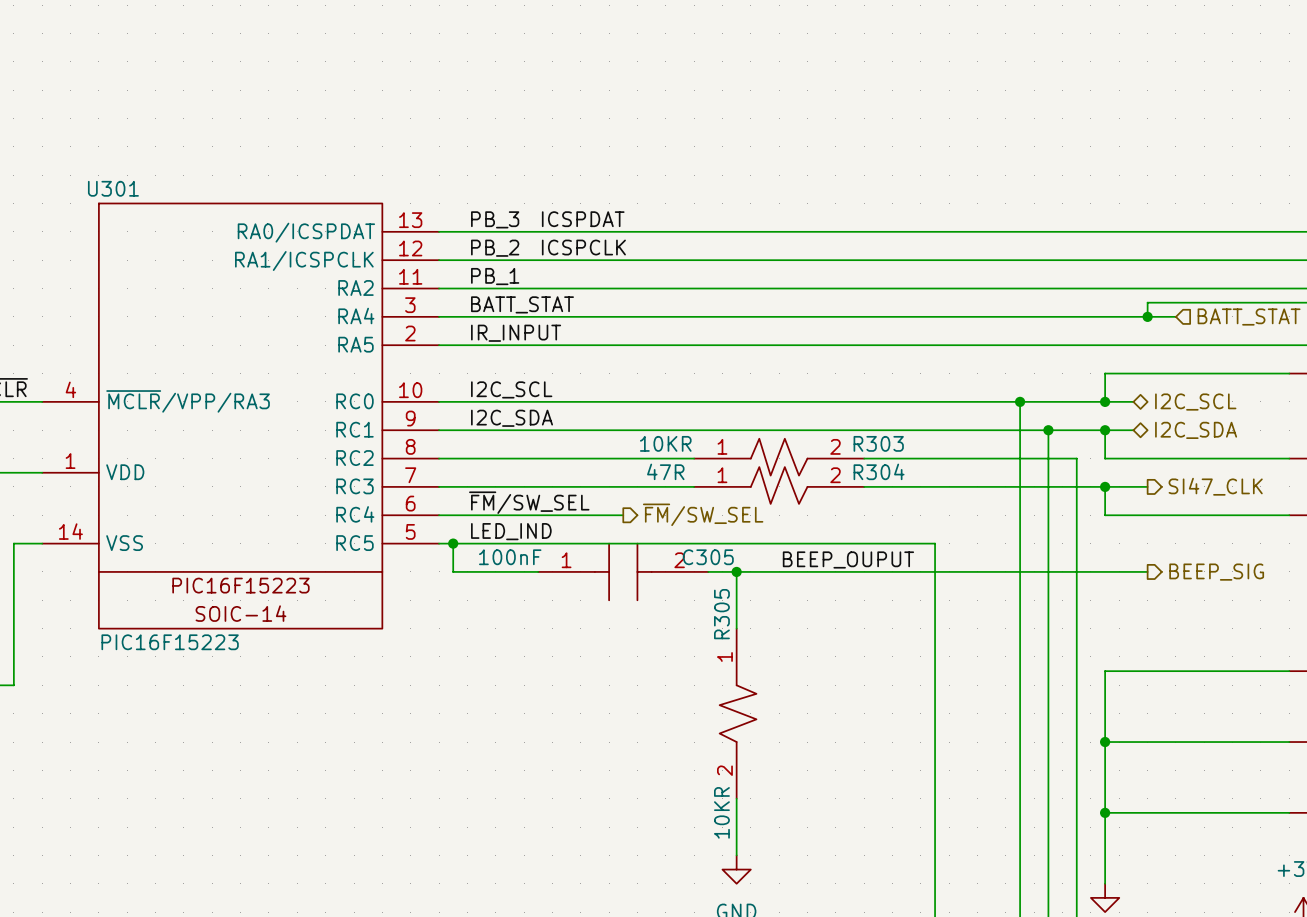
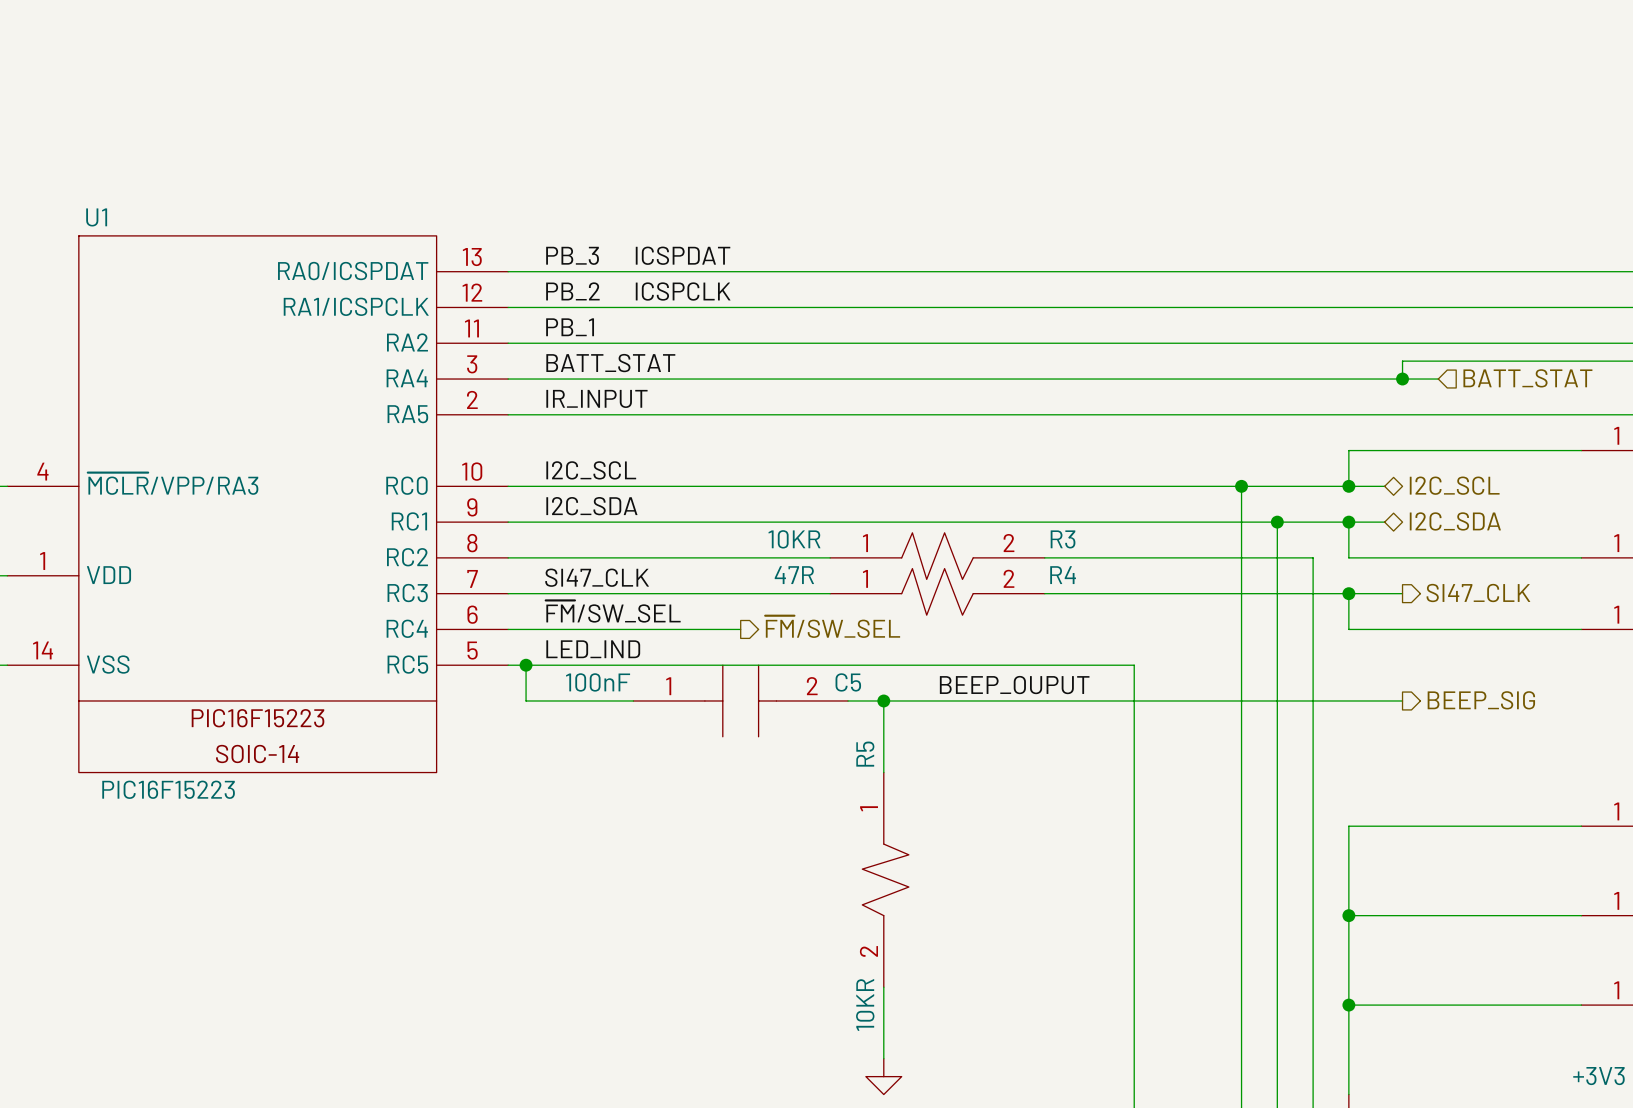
U301 name: U301 (113, 188) -> U1 (96, 217)
R303 name: R303 (878, 443) -> R3 (1063, 539)
R304 name: R304 (879, 471) -> R4 (1063, 575)
label: none -> SI47_CLK (597, 577)
C305 name: C305 (708, 557) -> C5 (848, 682)
R305 name: R305 (721, 614) -> R5 (865, 754)

